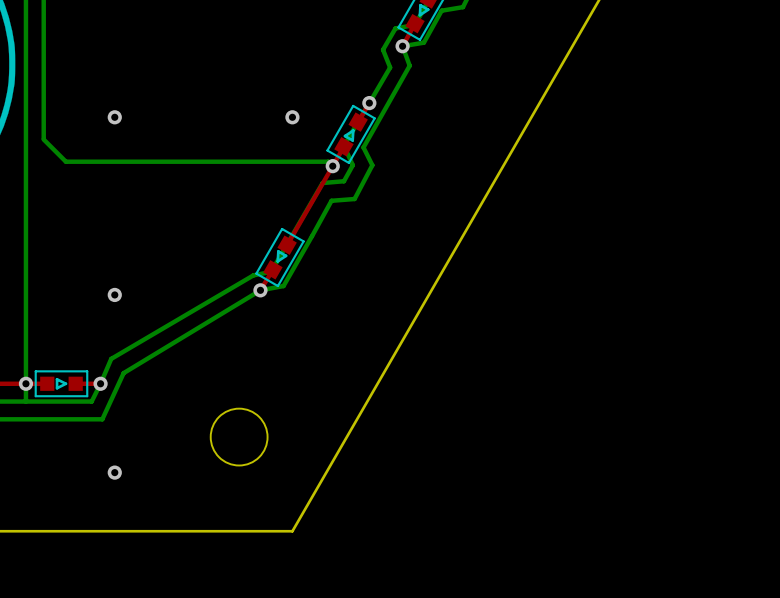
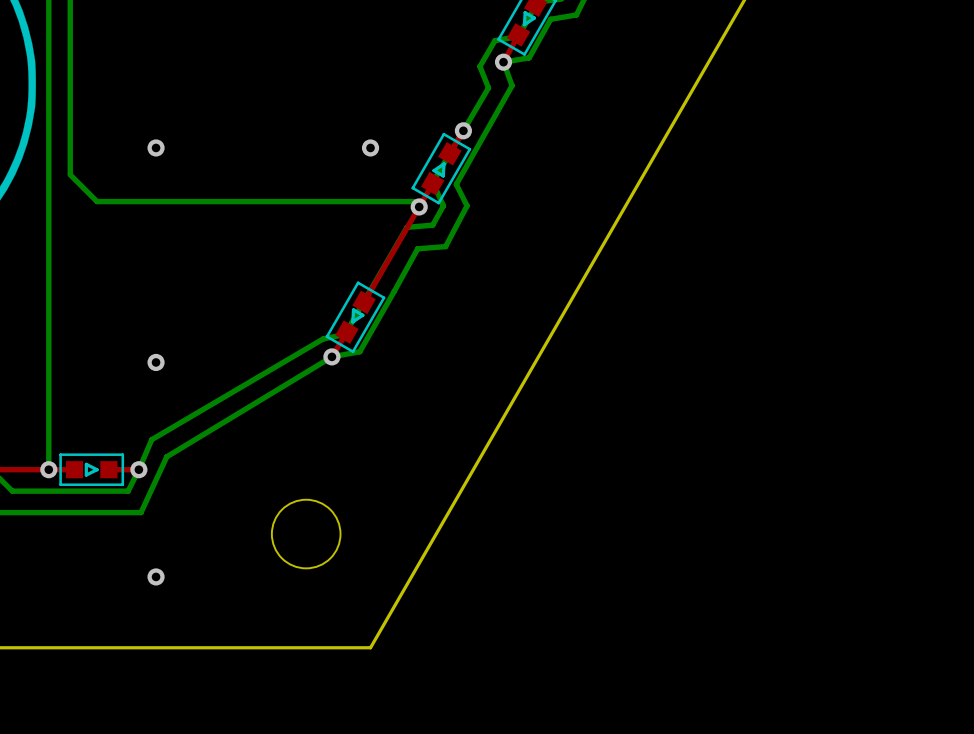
bottom track: (25, 383) (25, 401) -> none

